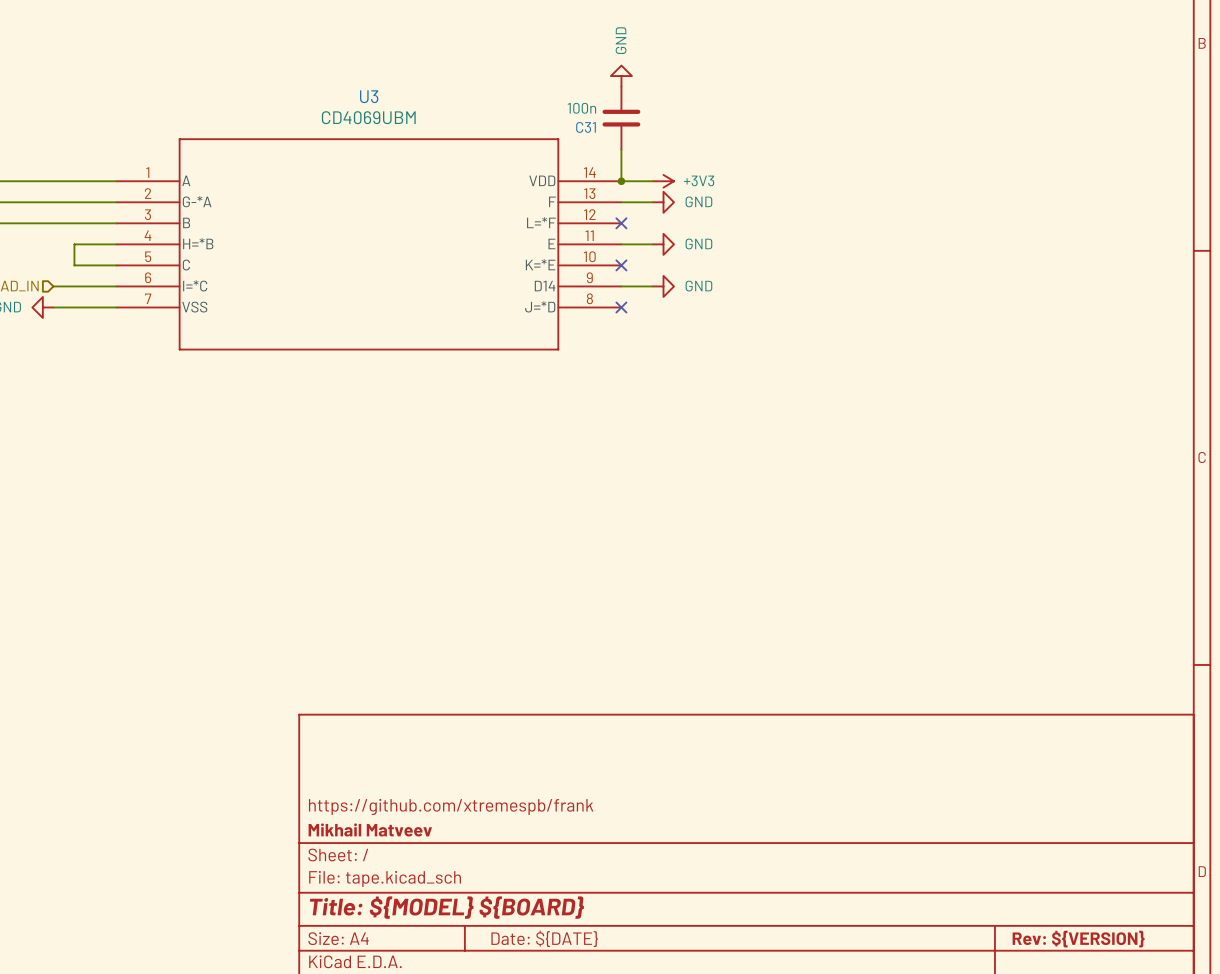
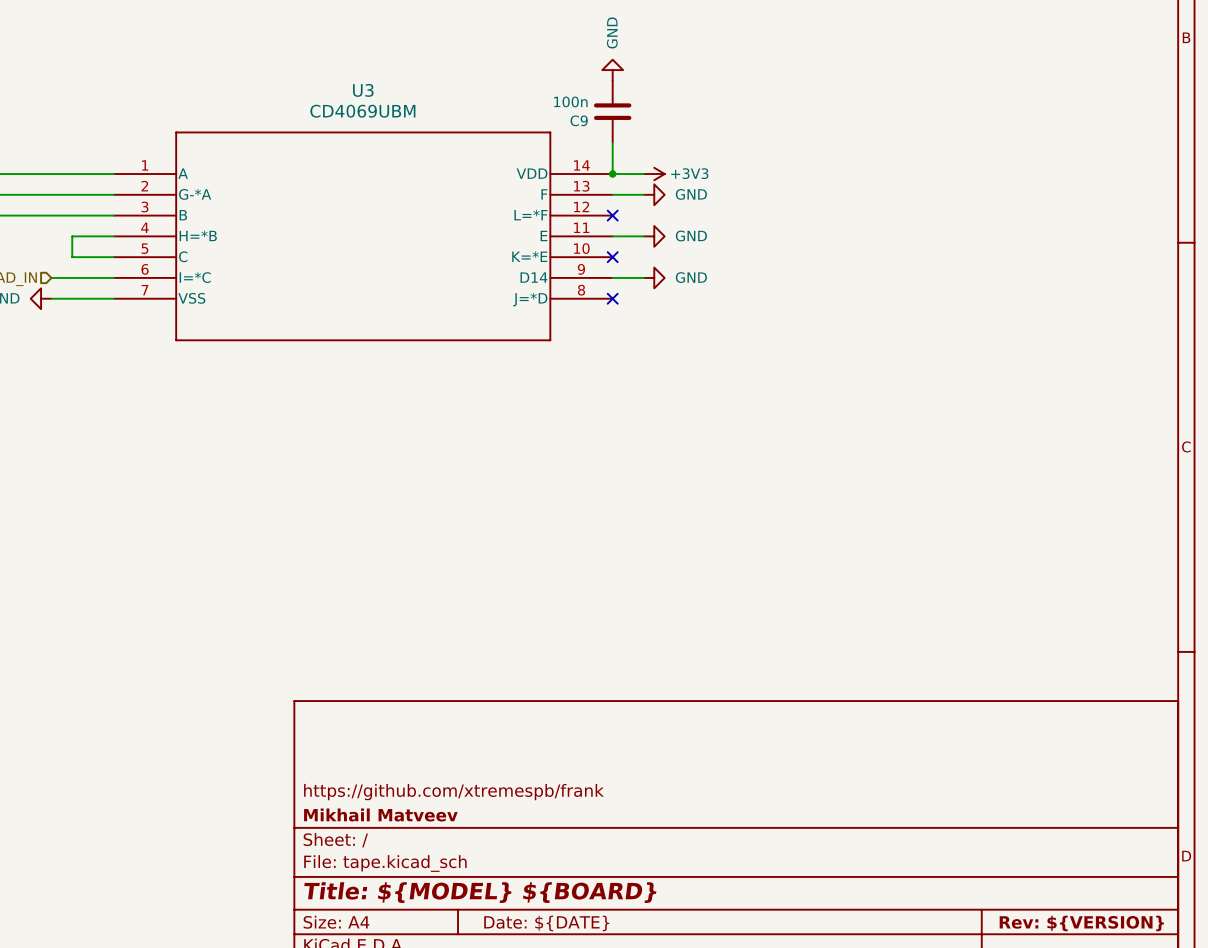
C31 name: C31 (586, 127) -> C9 (579, 120)

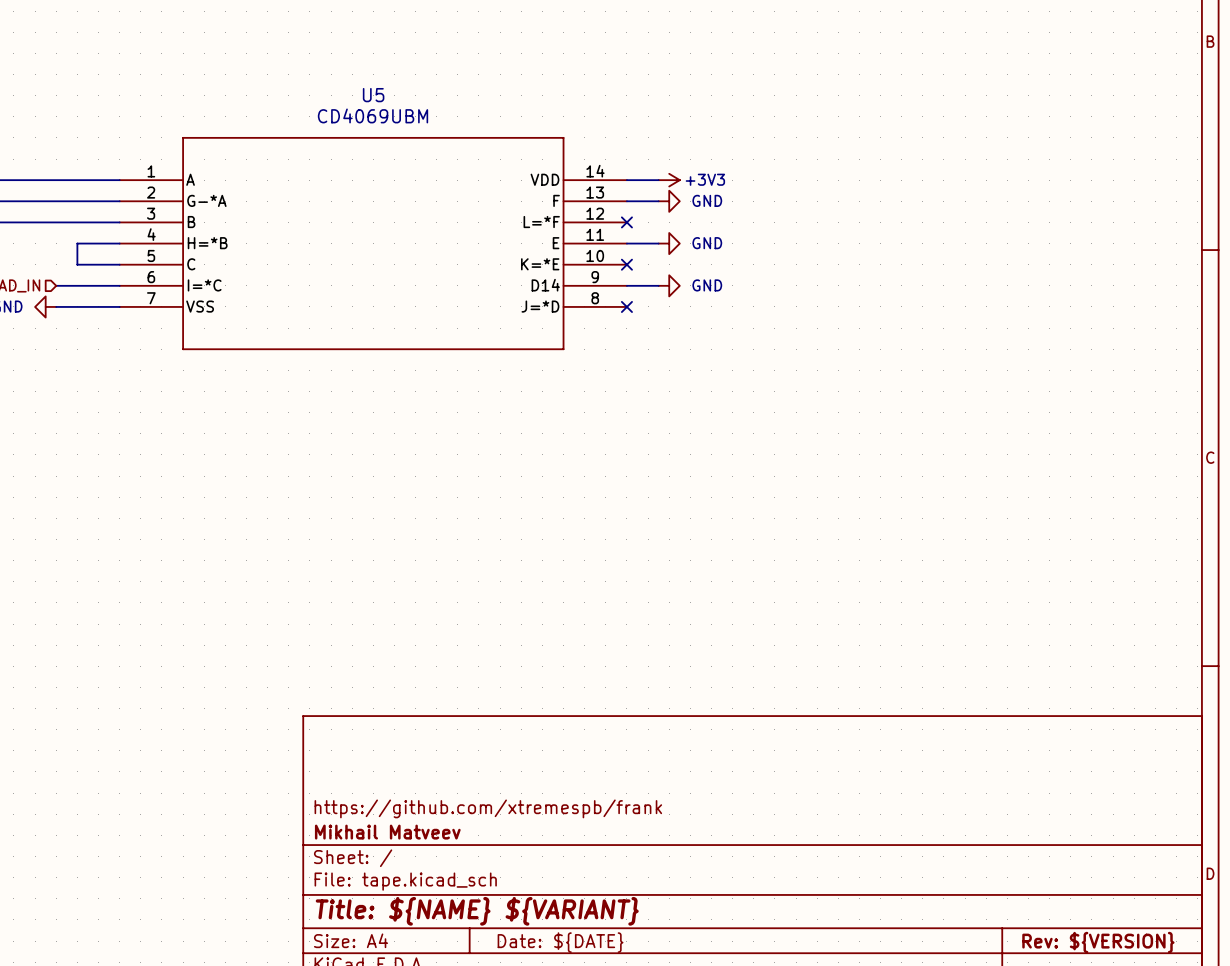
power symbol: GND (612, 70) -> none
U3 name: U3 (363, 90) -> U5 (373, 95)
C9: 100n (612, 111) -> none
wire: (612, 142) (612, 174) -> none
junction: (612, 174) -> none
title block: Title: ${MODEL} ${BOARD} (480, 892) -> Title: ${NAME} ${VARIANT} (477, 911)

